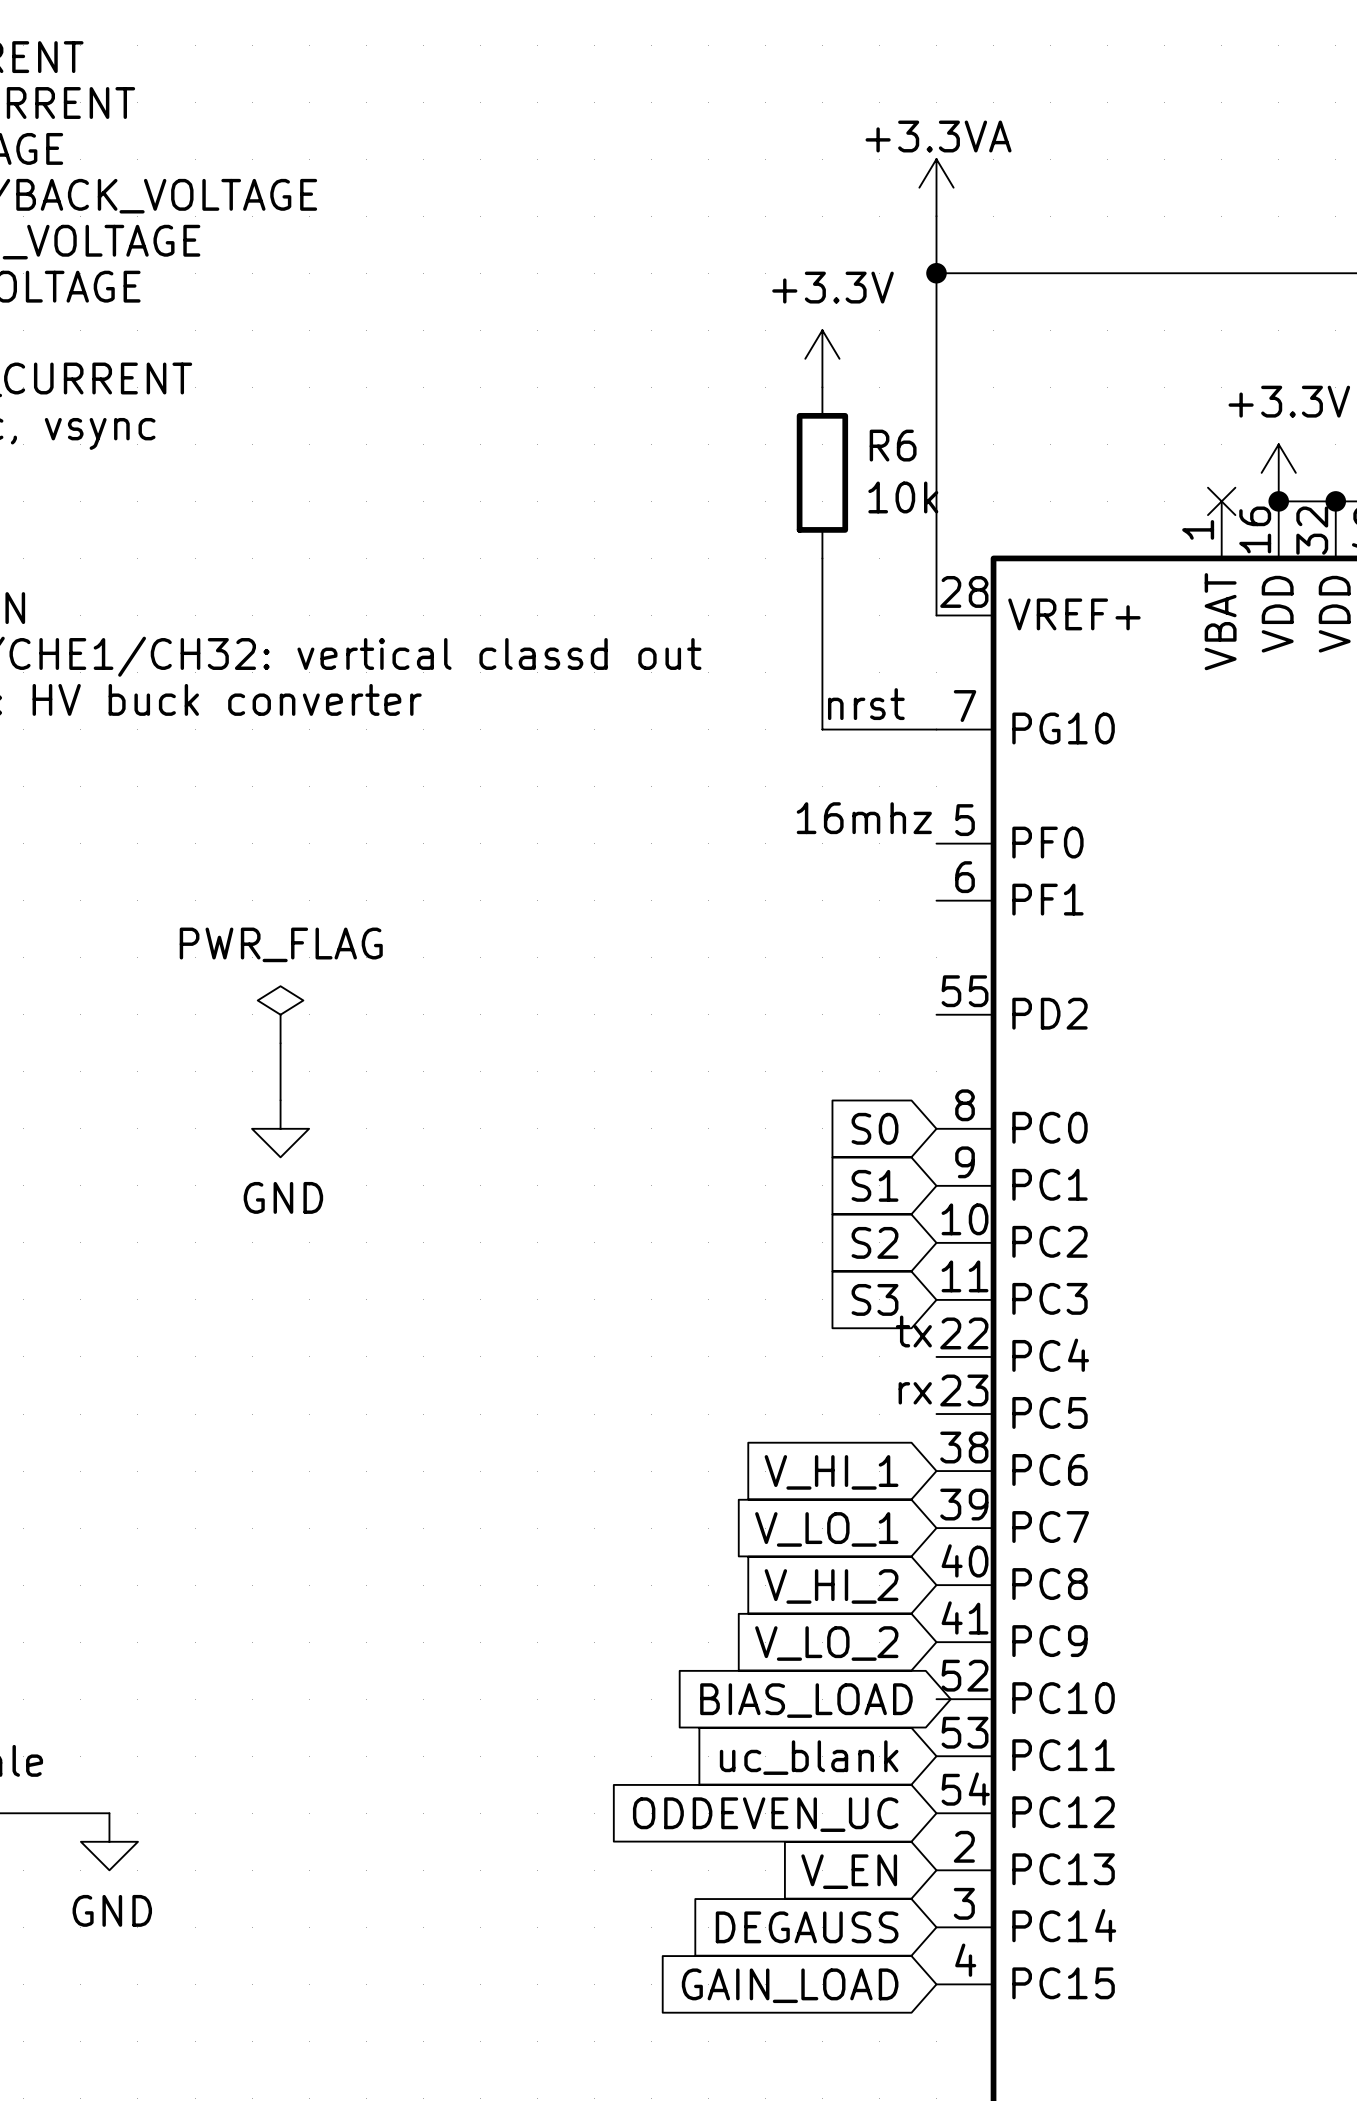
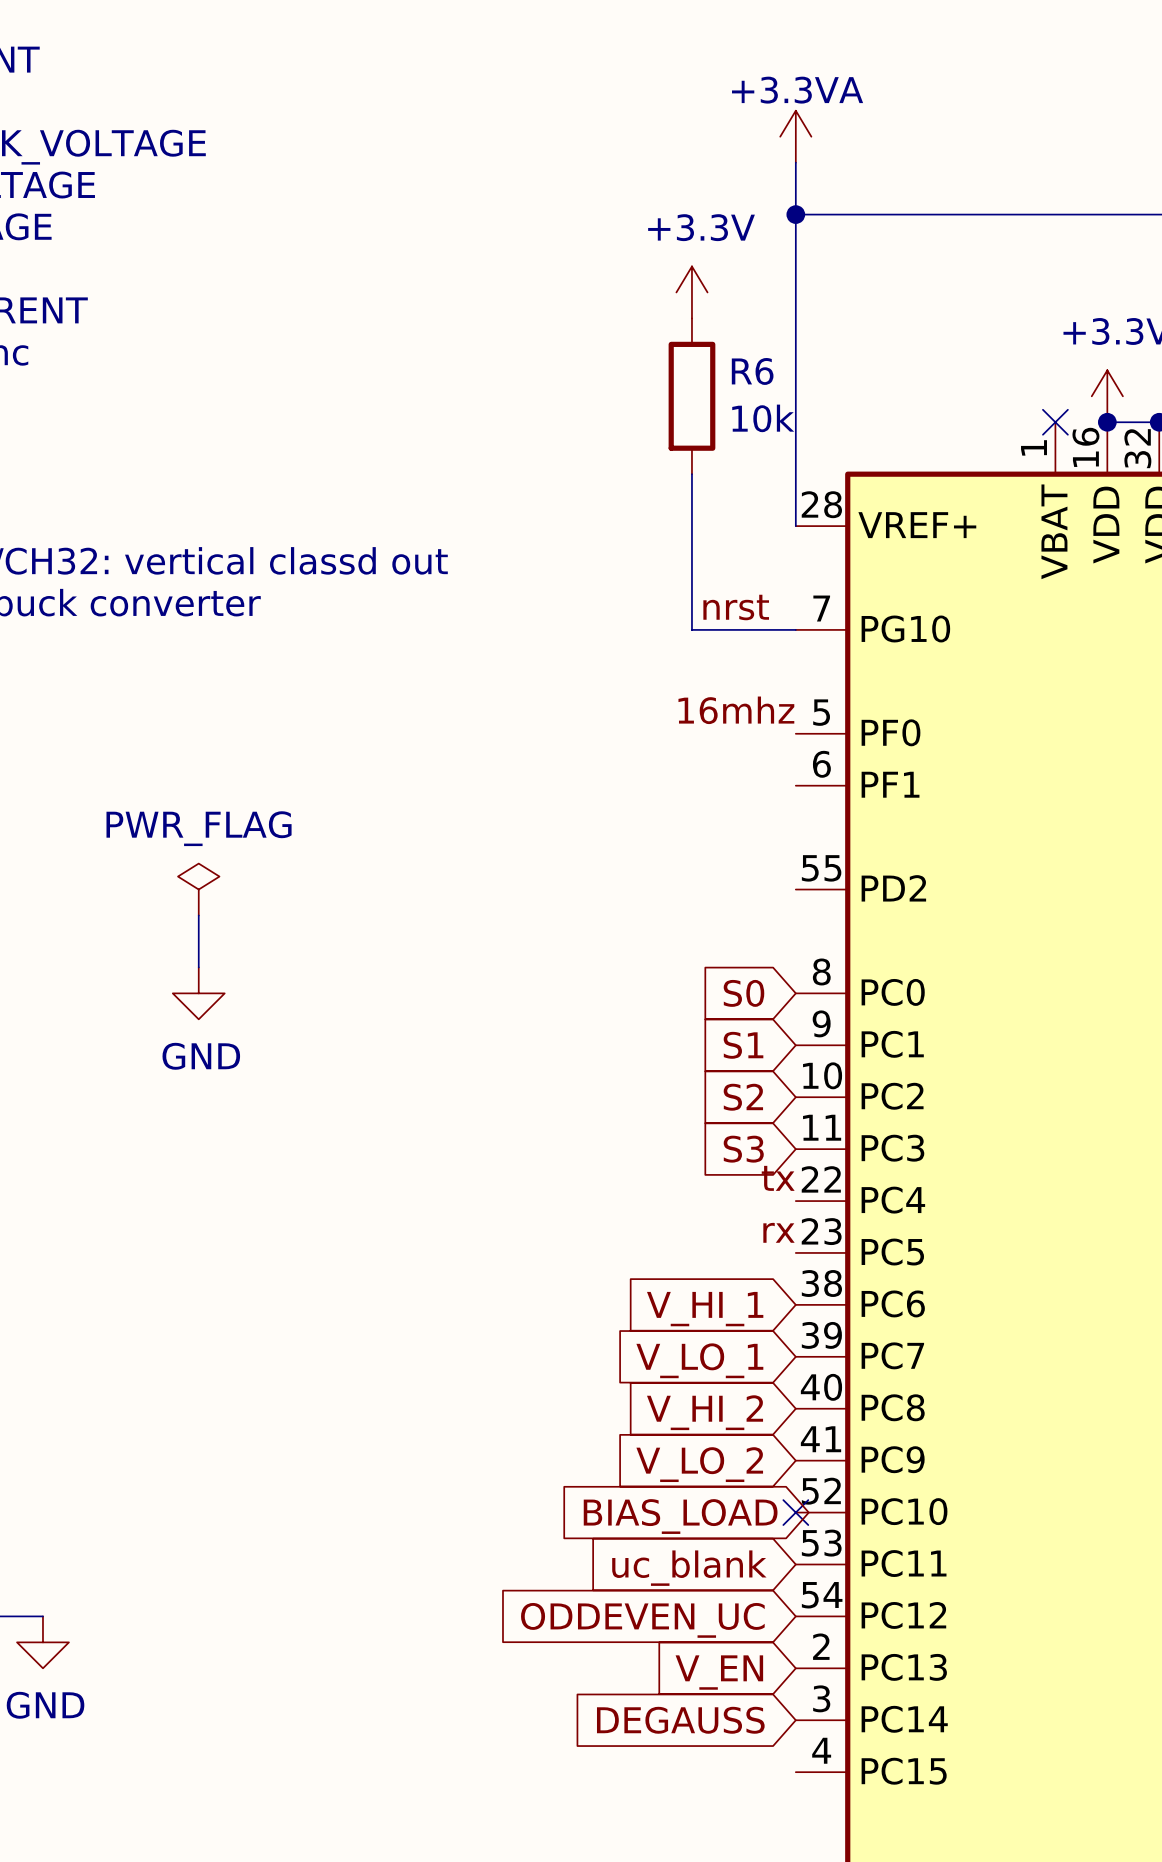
no-connect mark: none -> (795, 1512)
global label: GAIN_LOAD (790, 1985) -> none

